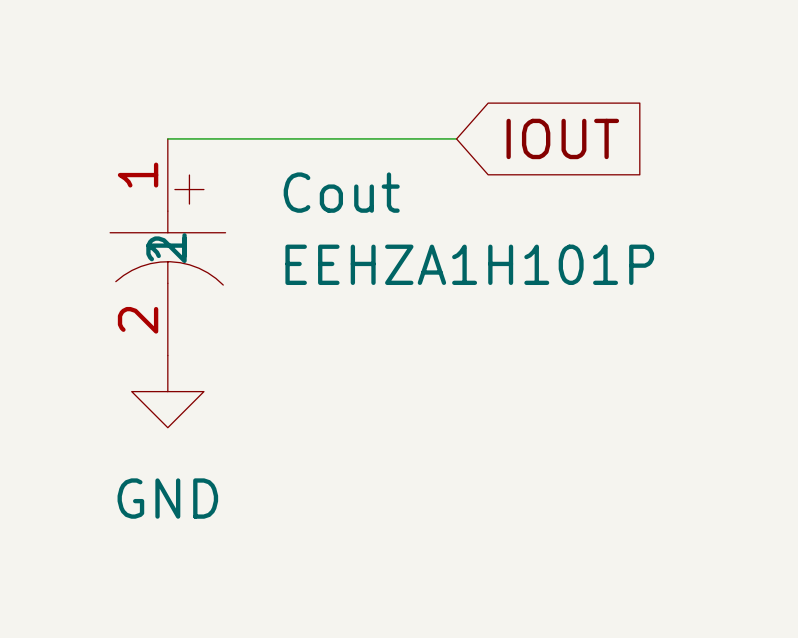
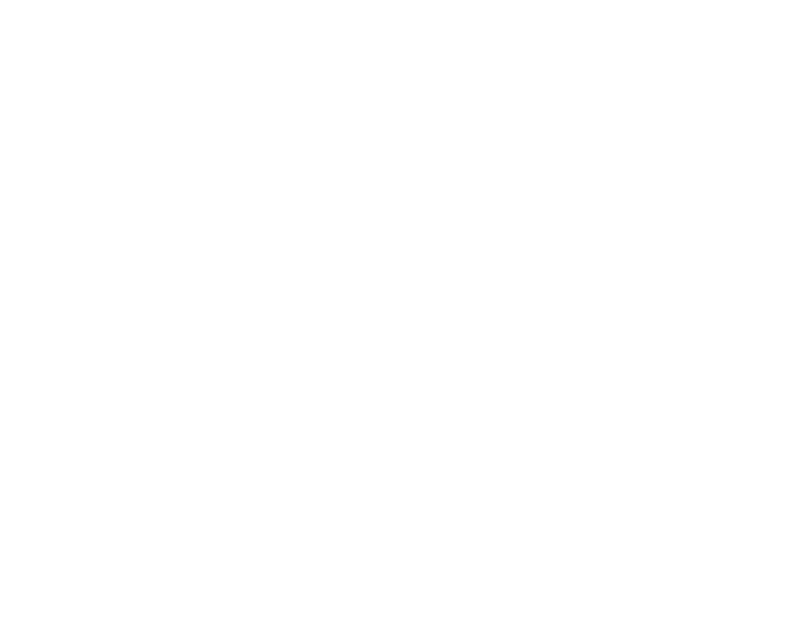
wire: (167, 138) (456, 138) -> none
global label: IOUT (562, 138) -> none
Cout: EEHZA1H101P (167, 247) -> none
power symbol: GND (167, 391) -> none

